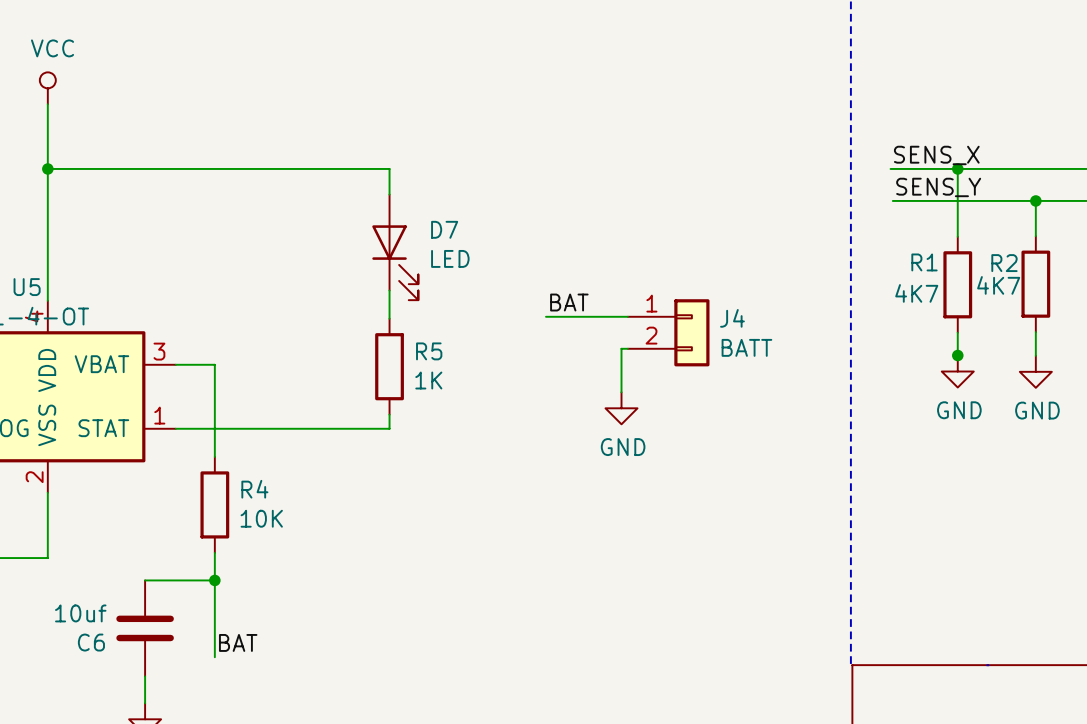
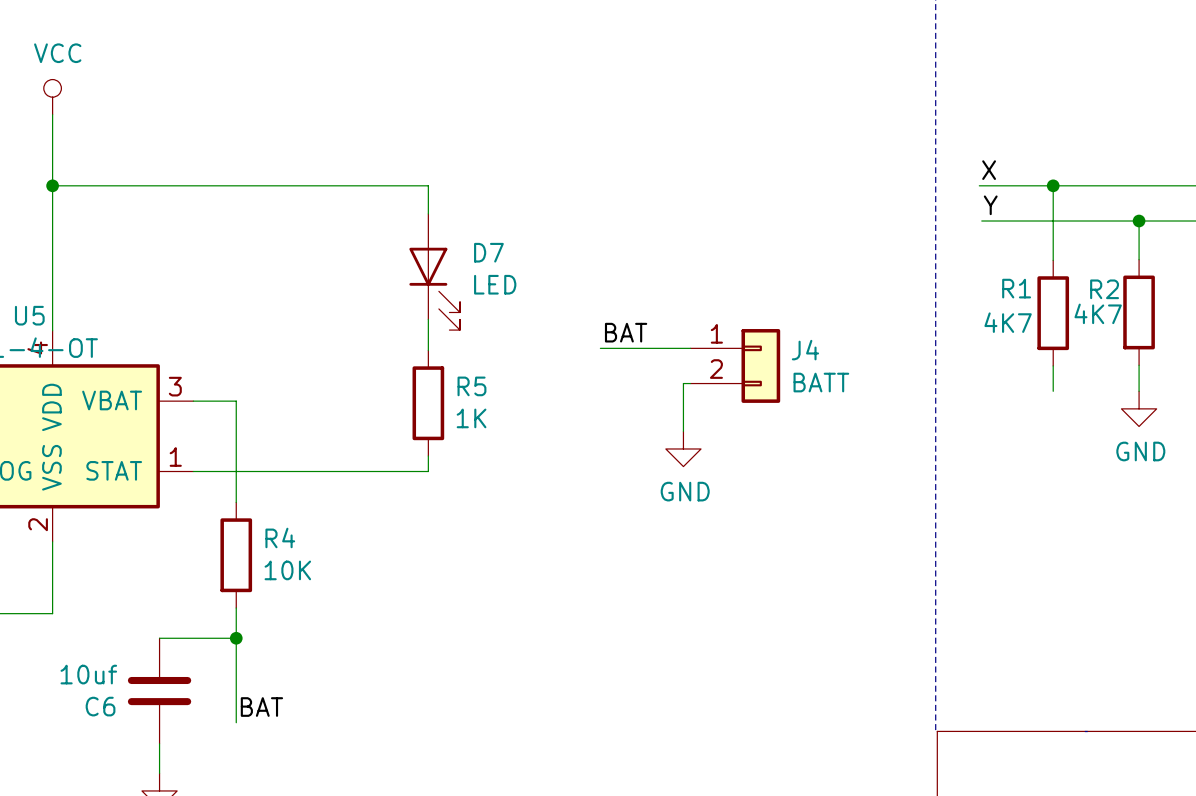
label: SENS_X (936, 155) -> X (989, 170)
label: SENS_Y (938, 187) -> Y (990, 205)
junction: (957, 355) -> none
power symbol: GND (957, 371) -> none

